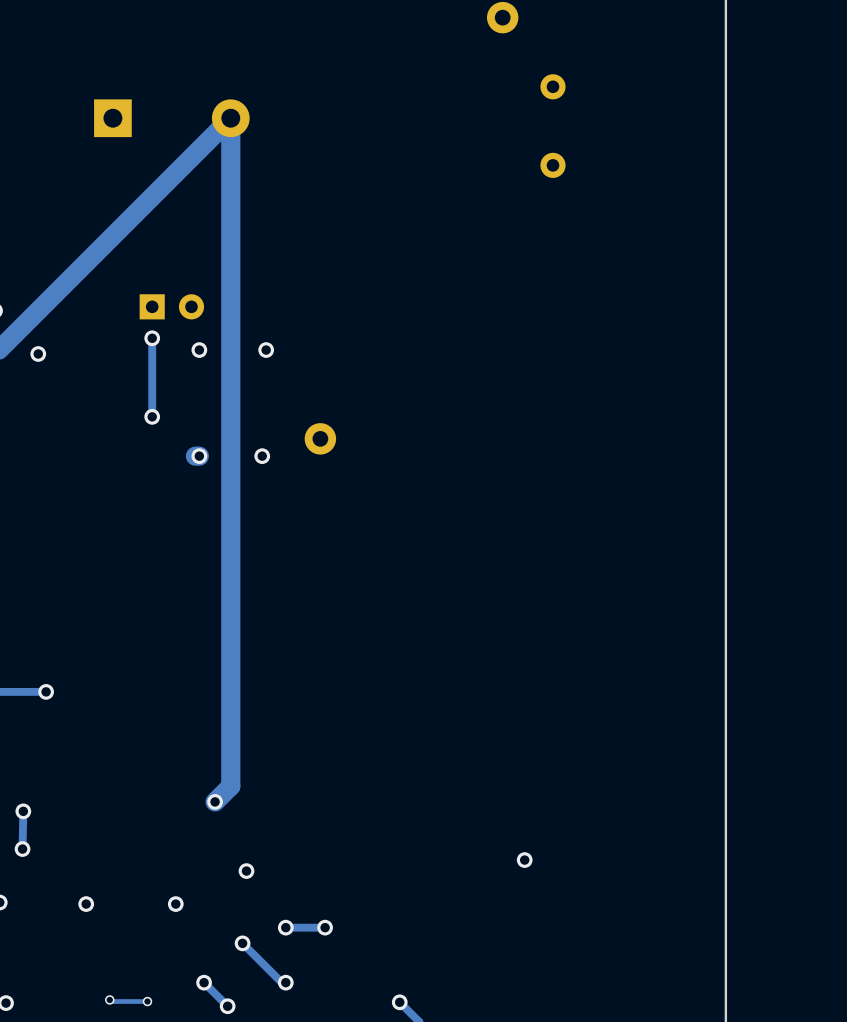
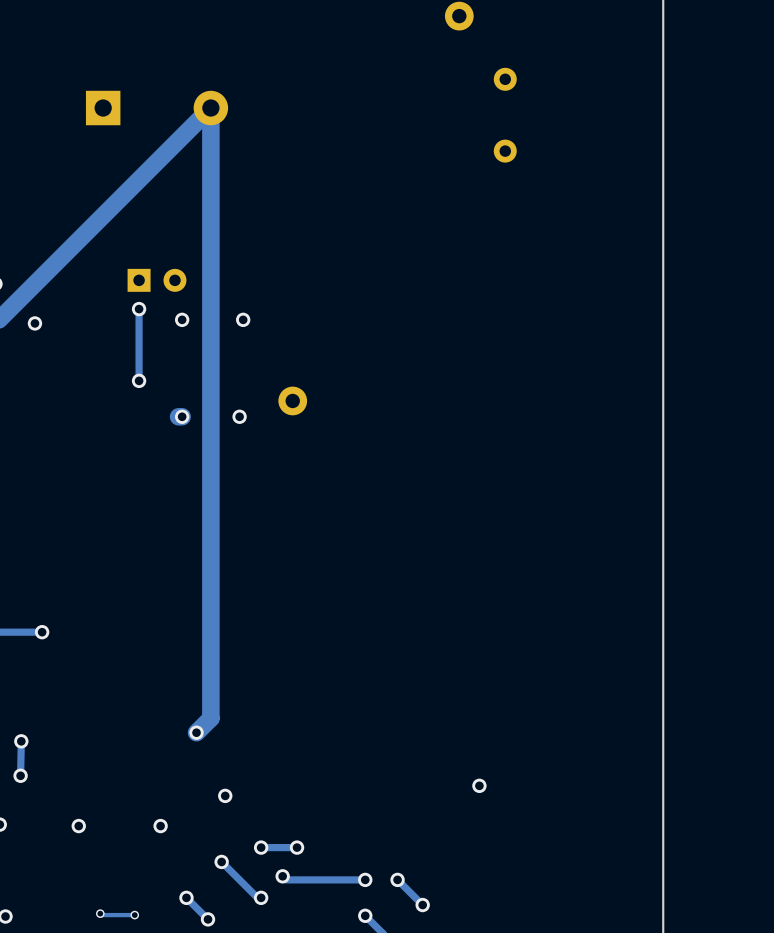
track: none -> (282, 876) (286, 879) (365, 879)
via: none -> (282, 876)
via: none -> (365, 879)
track: none -> (397, 879) (422, 905)
via: none -> (397, 879)
via: none -> (422, 905)

